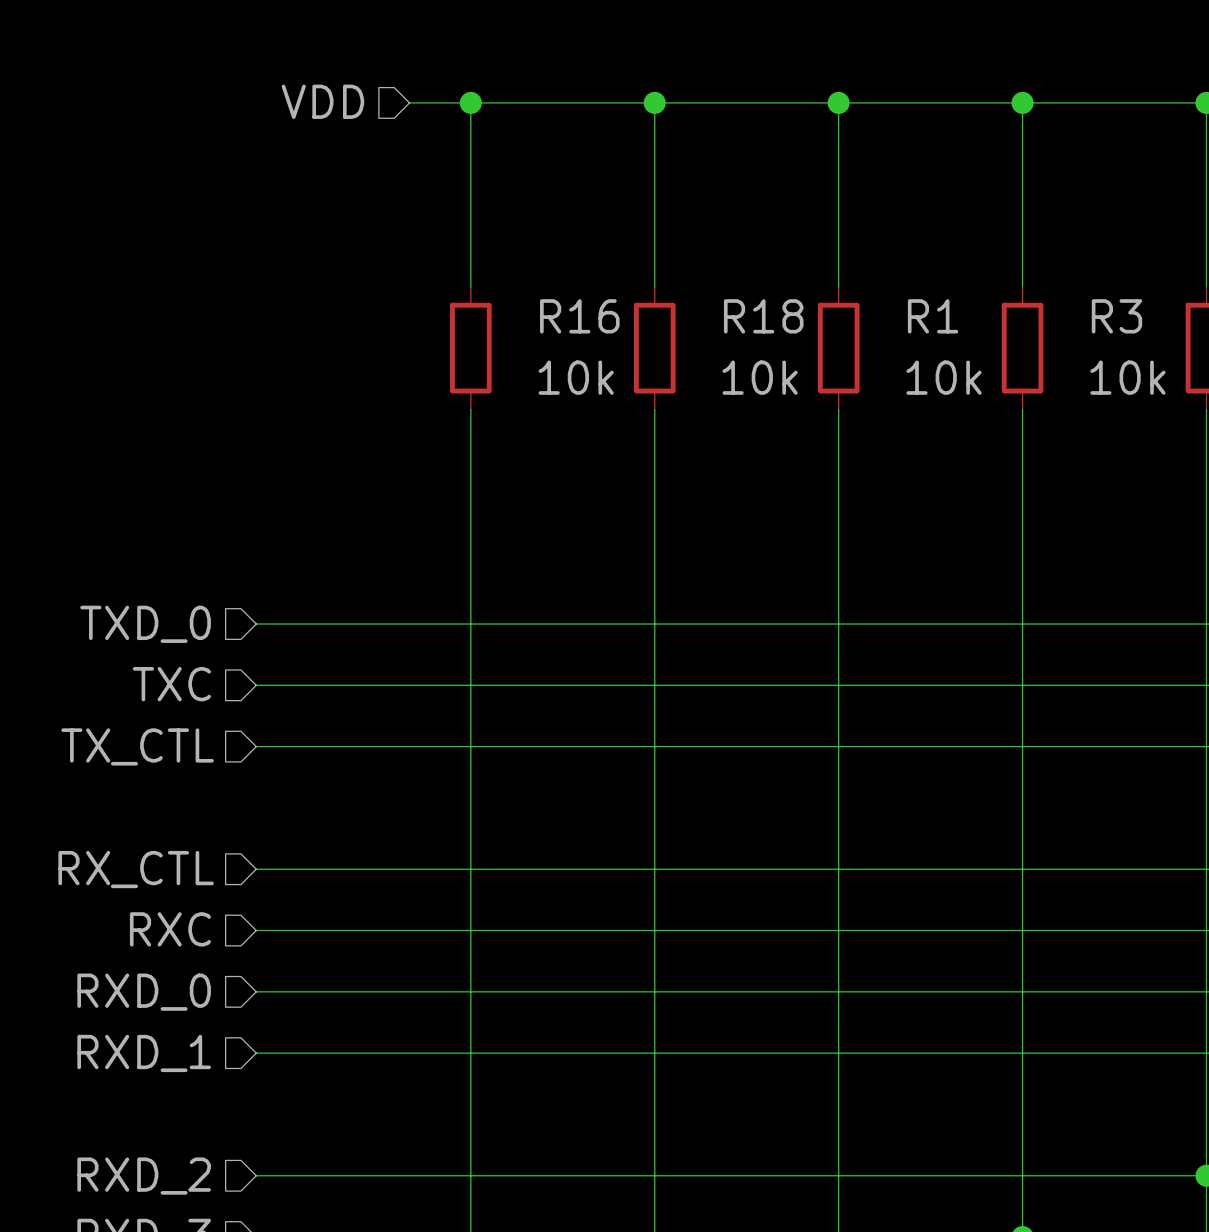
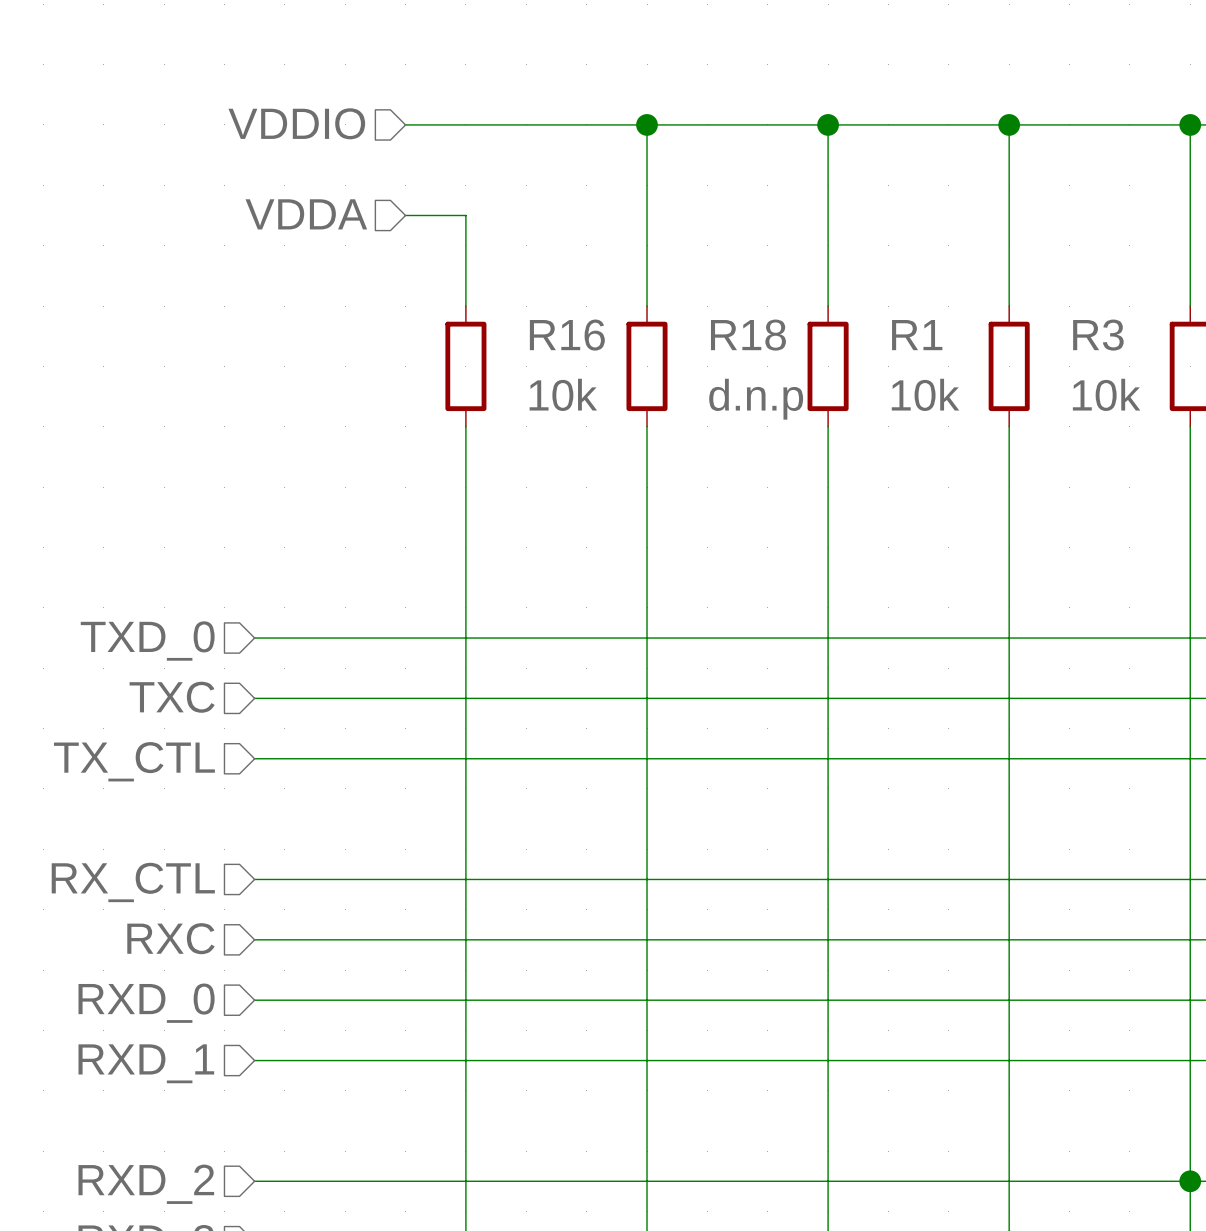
hierarchical label: VDD (322, 101) -> VDDIO (296, 123)
wire: (470, 102) (470, 194) -> (405, 215) (465, 215)
junction: (470, 102) -> none
hierarchical label: none -> VDDA (306, 214)
R18 value: 10k (760, 377) -> d.n.p (756, 399)

